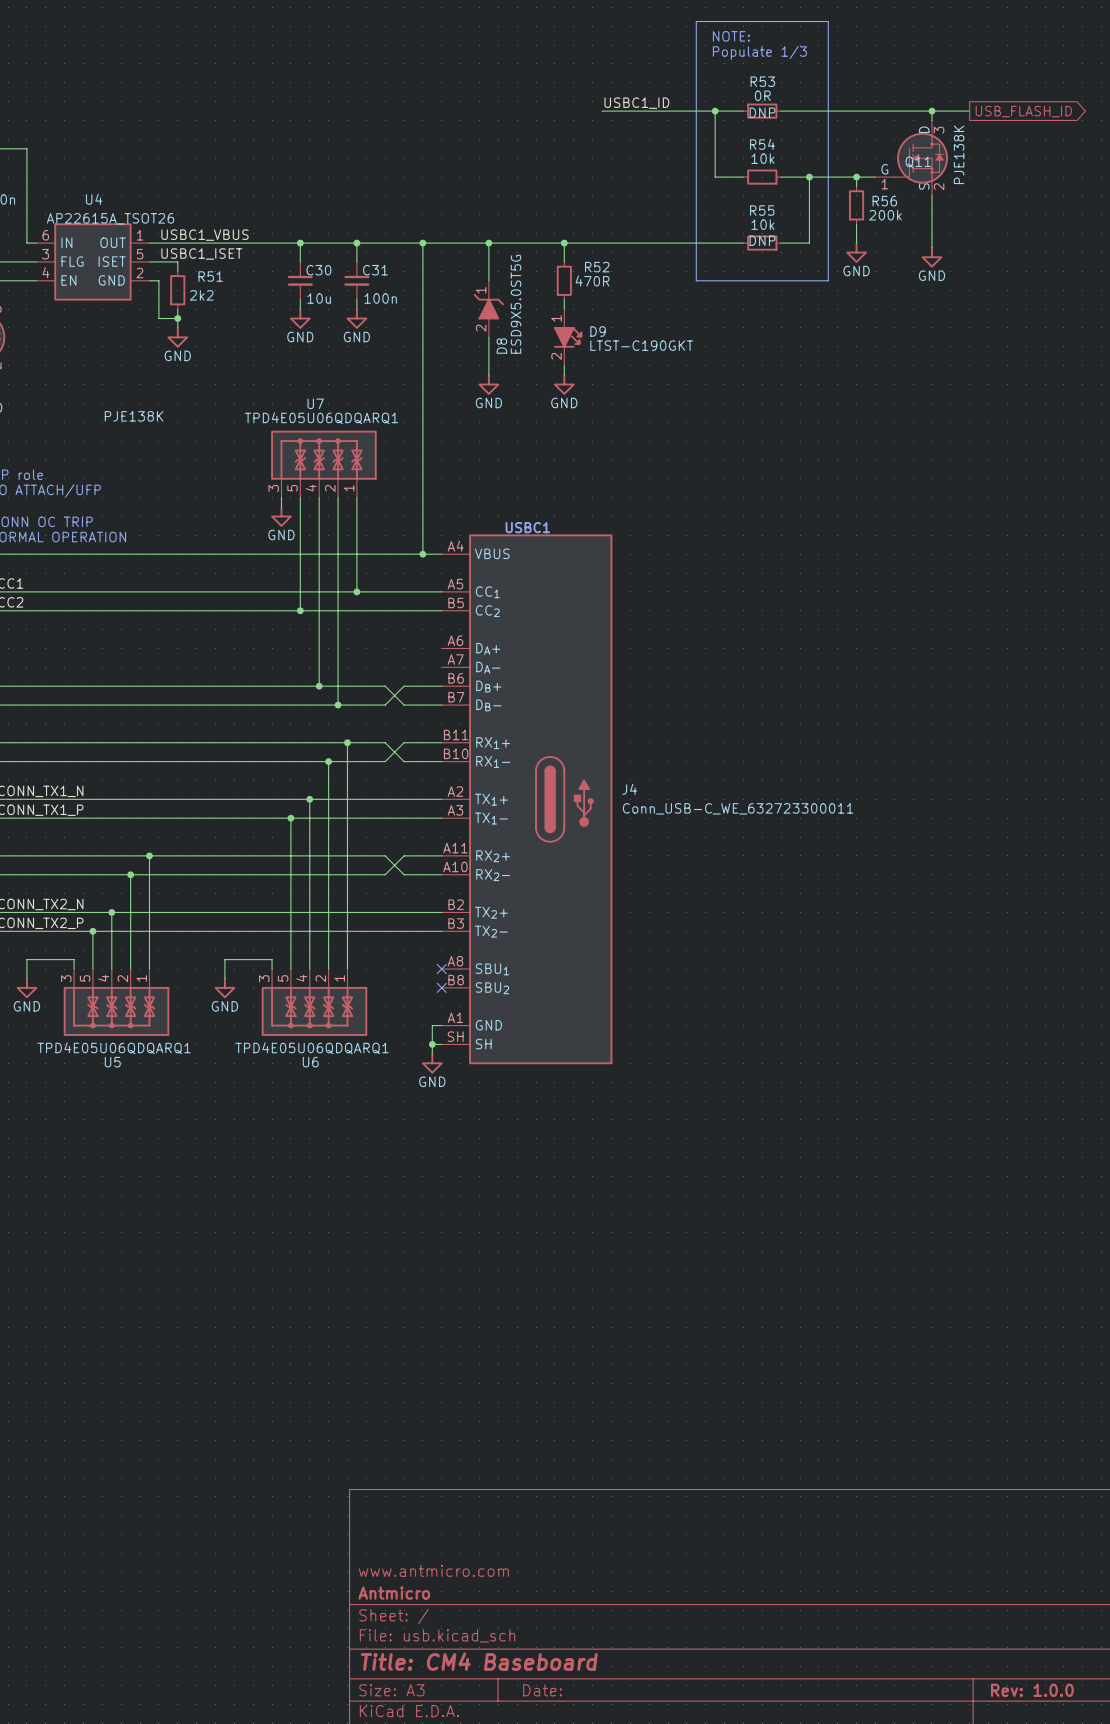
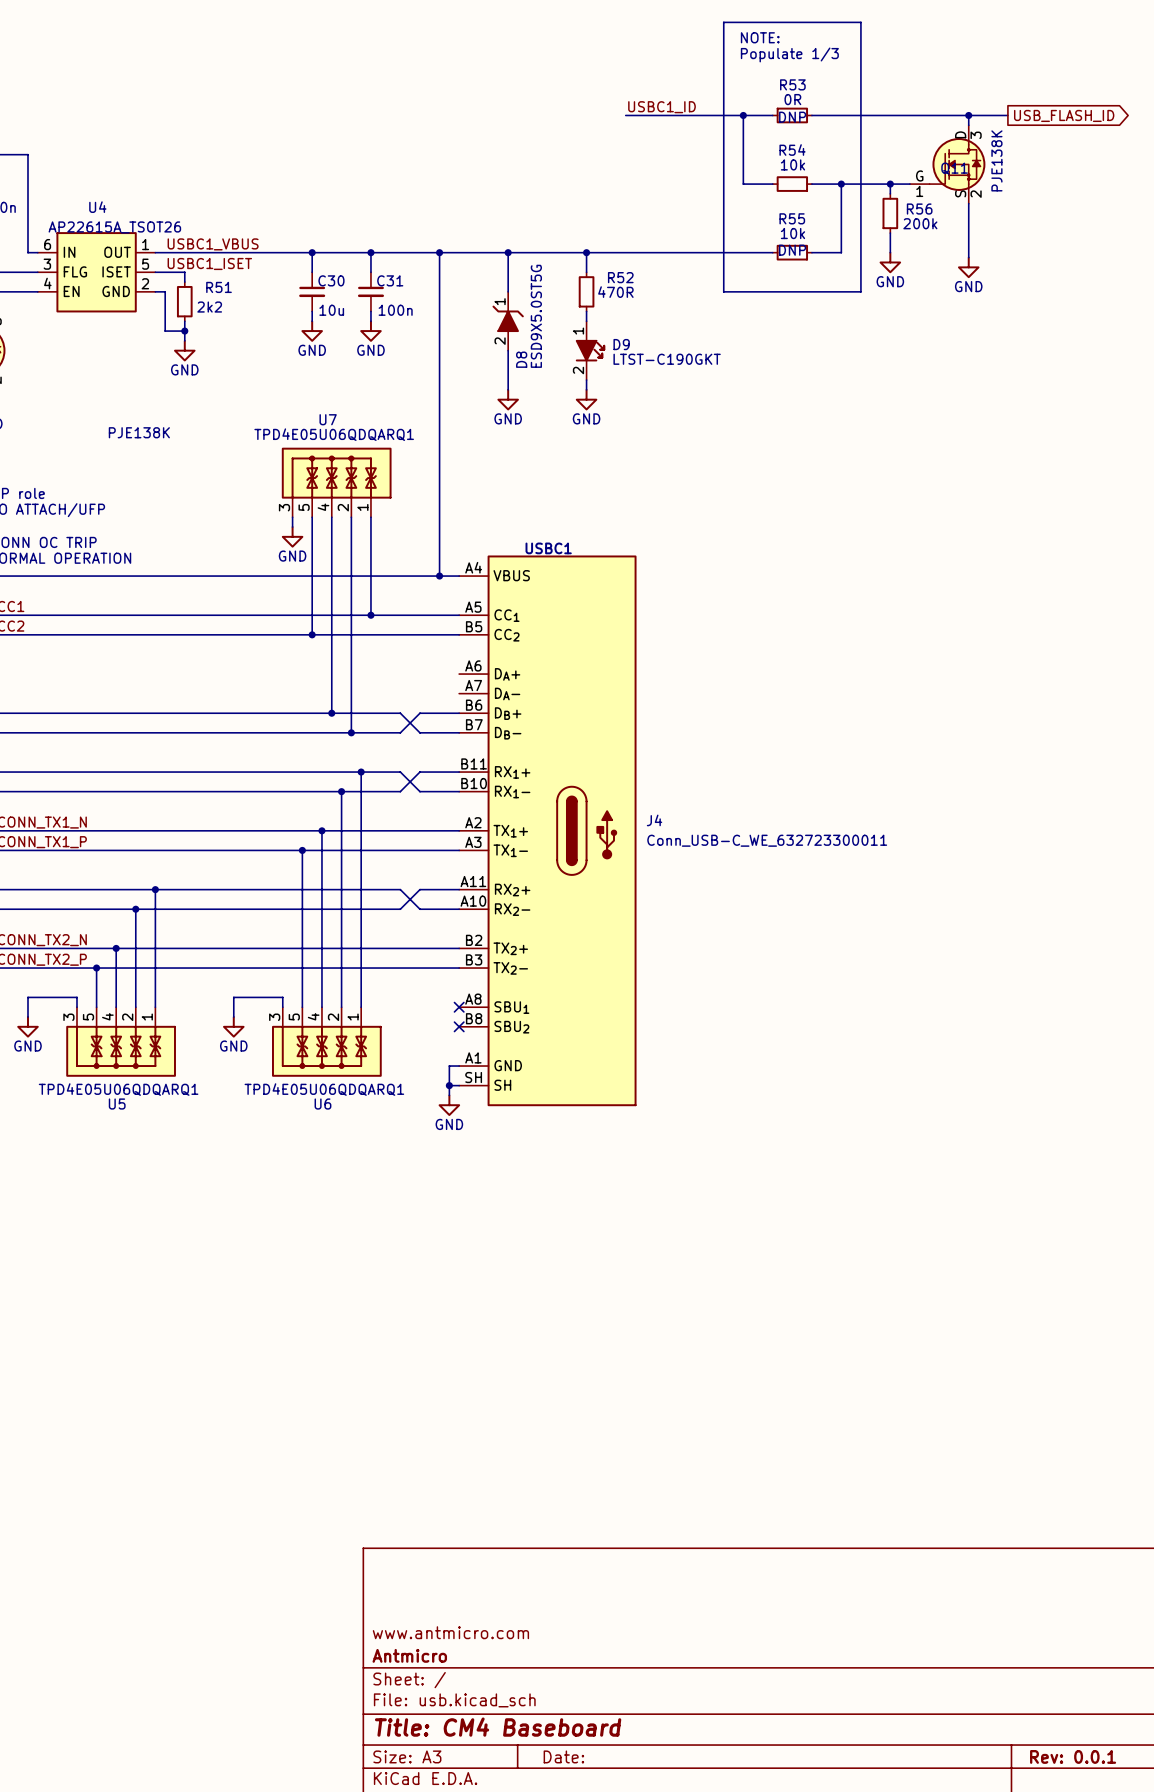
title block: Rev: 1.0.0 (1032, 1690) -> Rev: 0.0.1 (1073, 1756)

